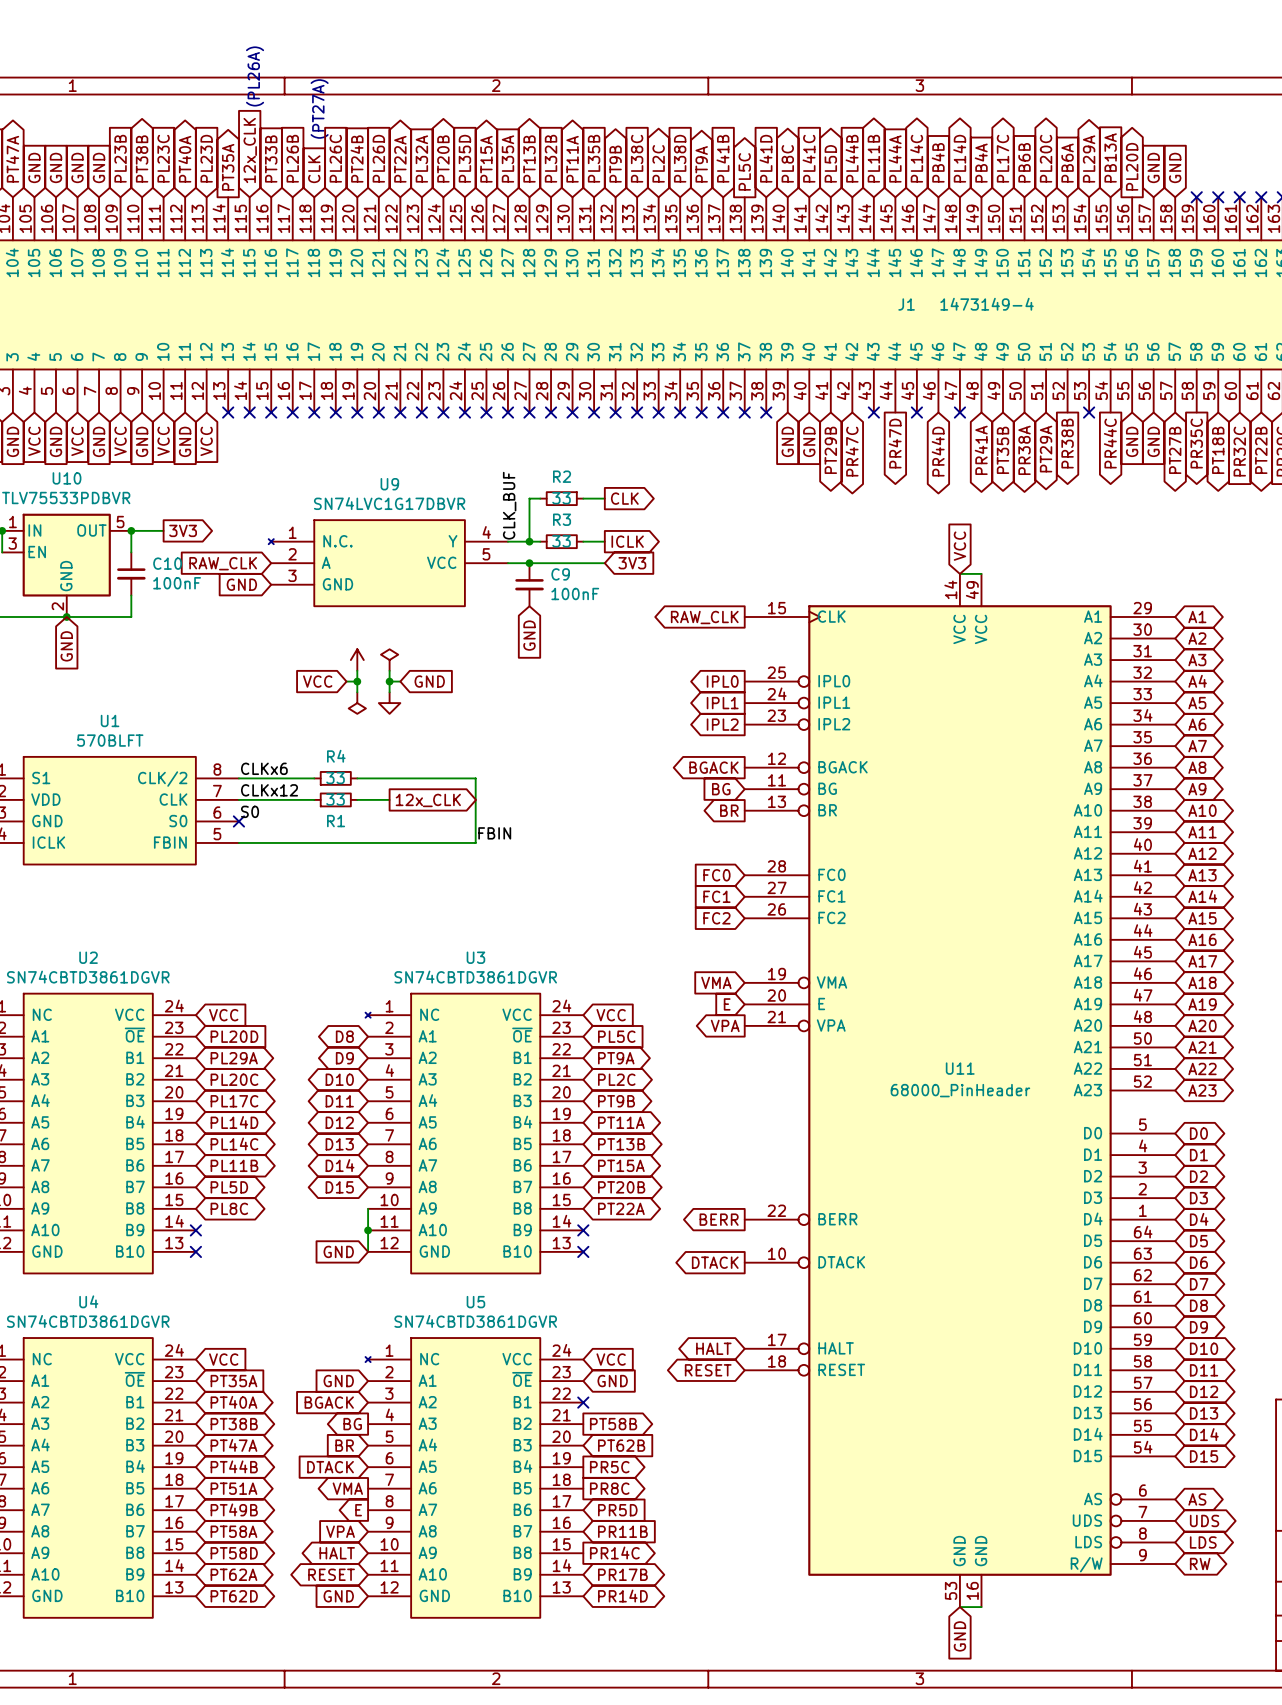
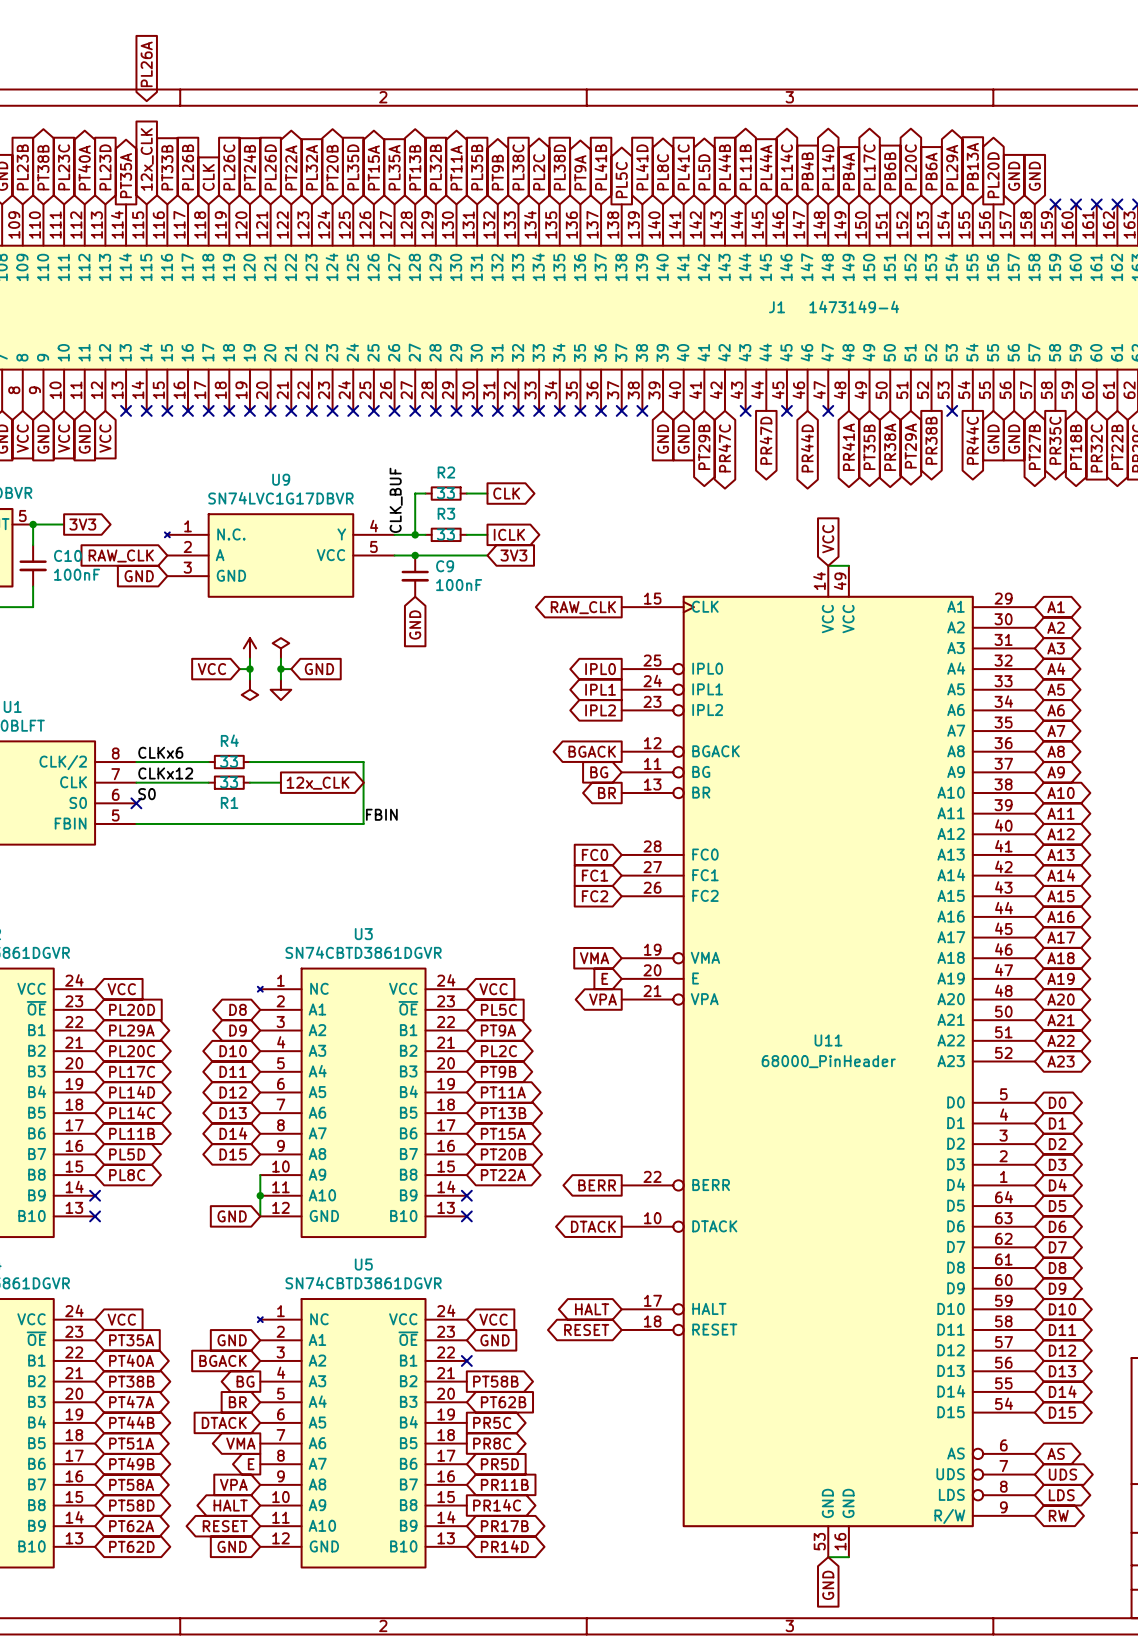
global label: none -> PL26A (146, 64)
text: (PL26A) (255, 76) -> none
text: (PT27A) (319, 109) -> none

